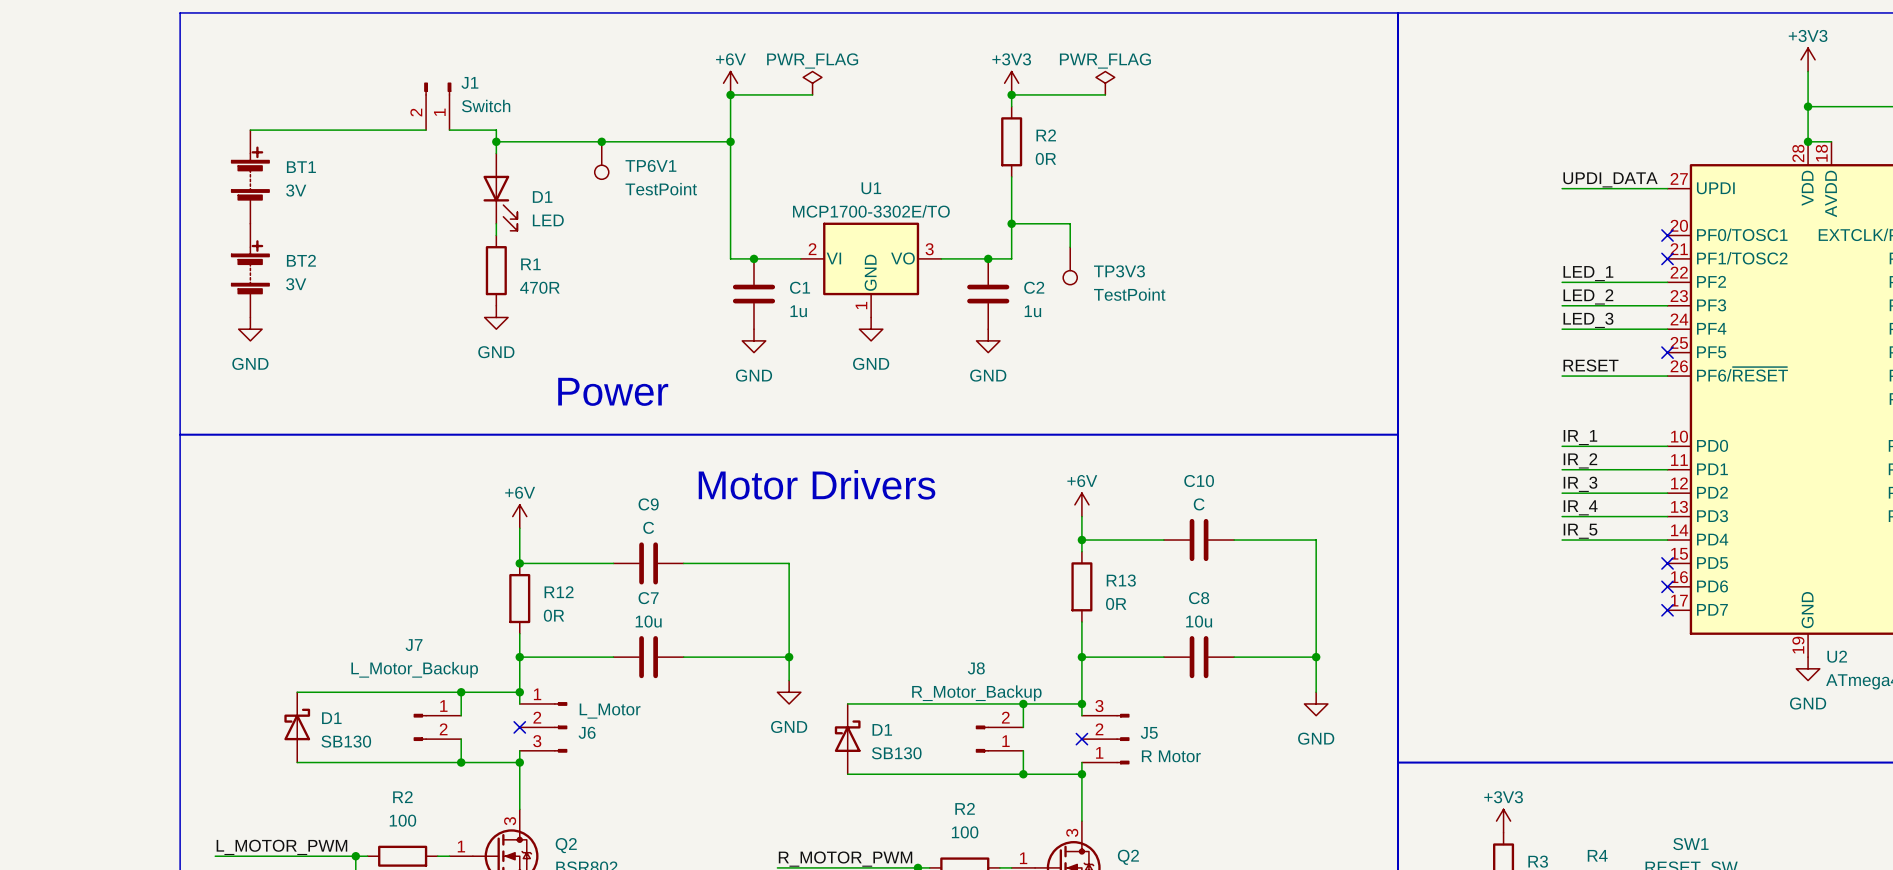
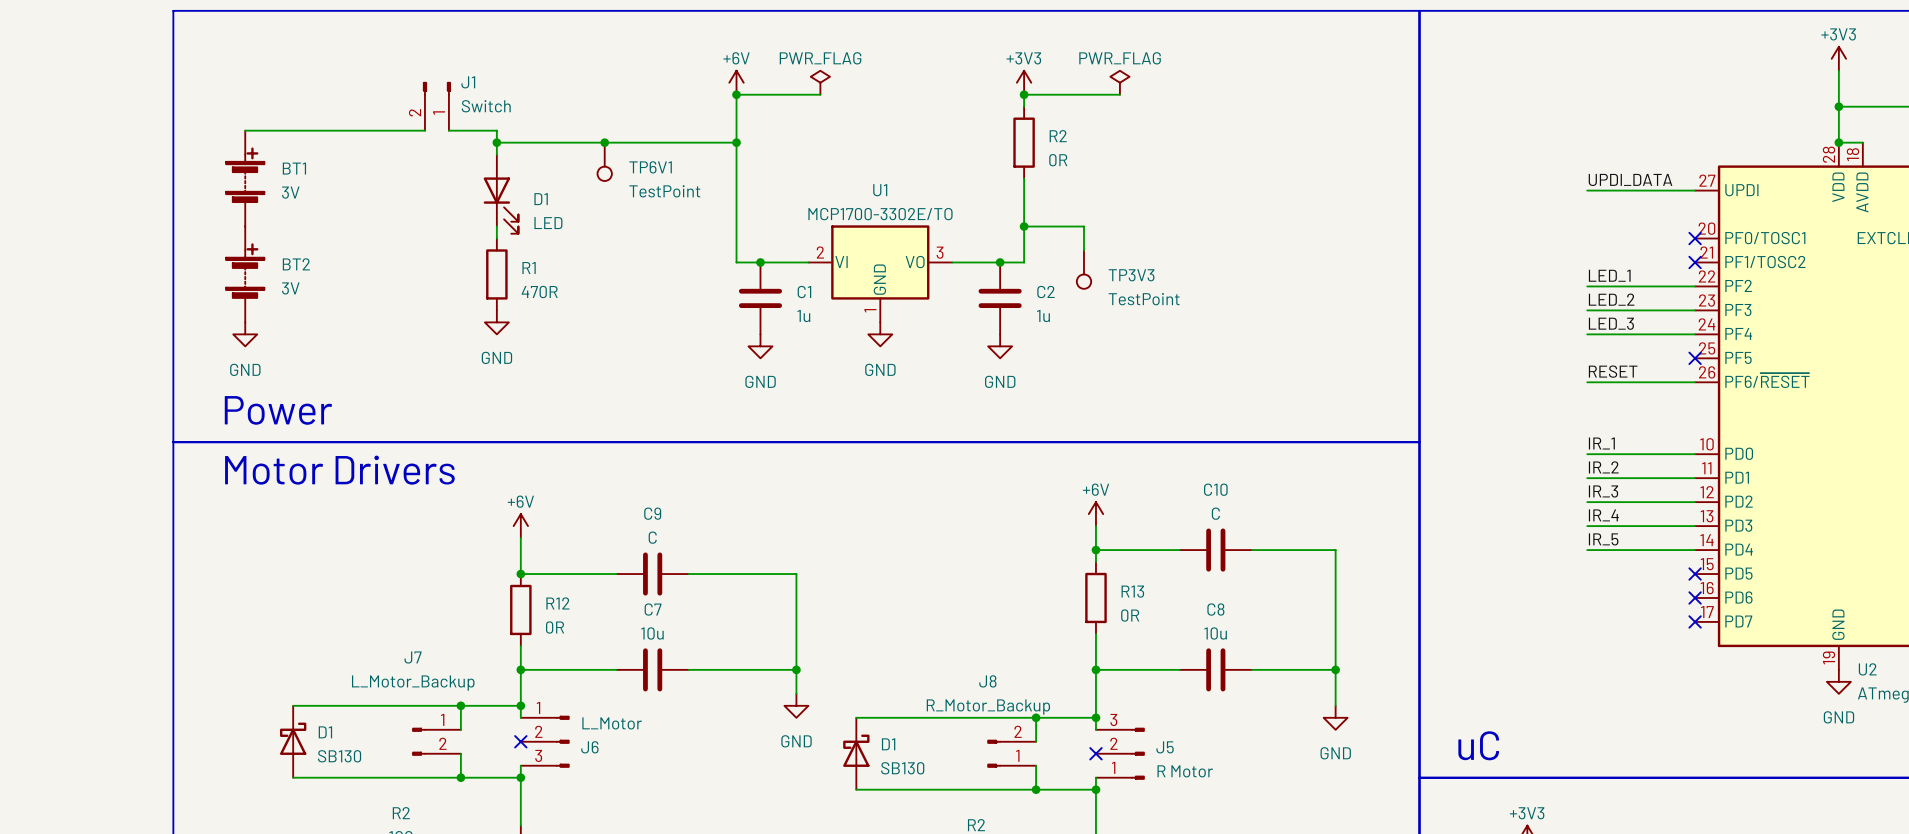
text: Power (613, 391) -> none
text: none -> Power (278, 410)
text: none -> Motor Drivers (339, 470)
text: Motor Drivers (817, 484) -> none
text: none -> uC (1478, 745)

